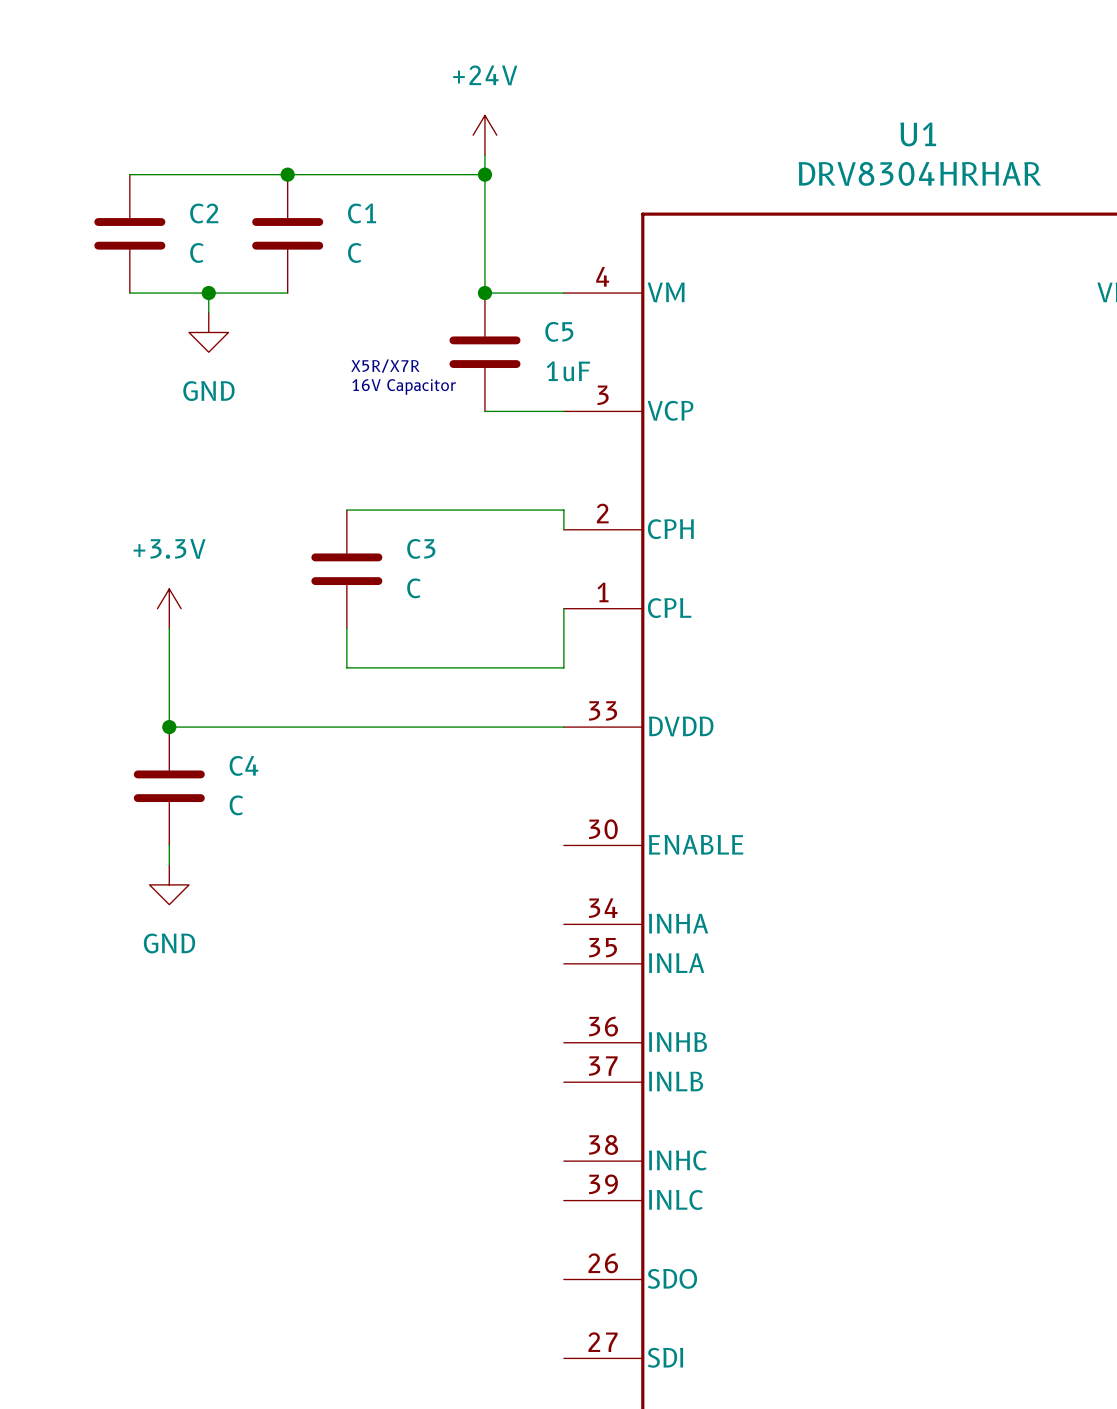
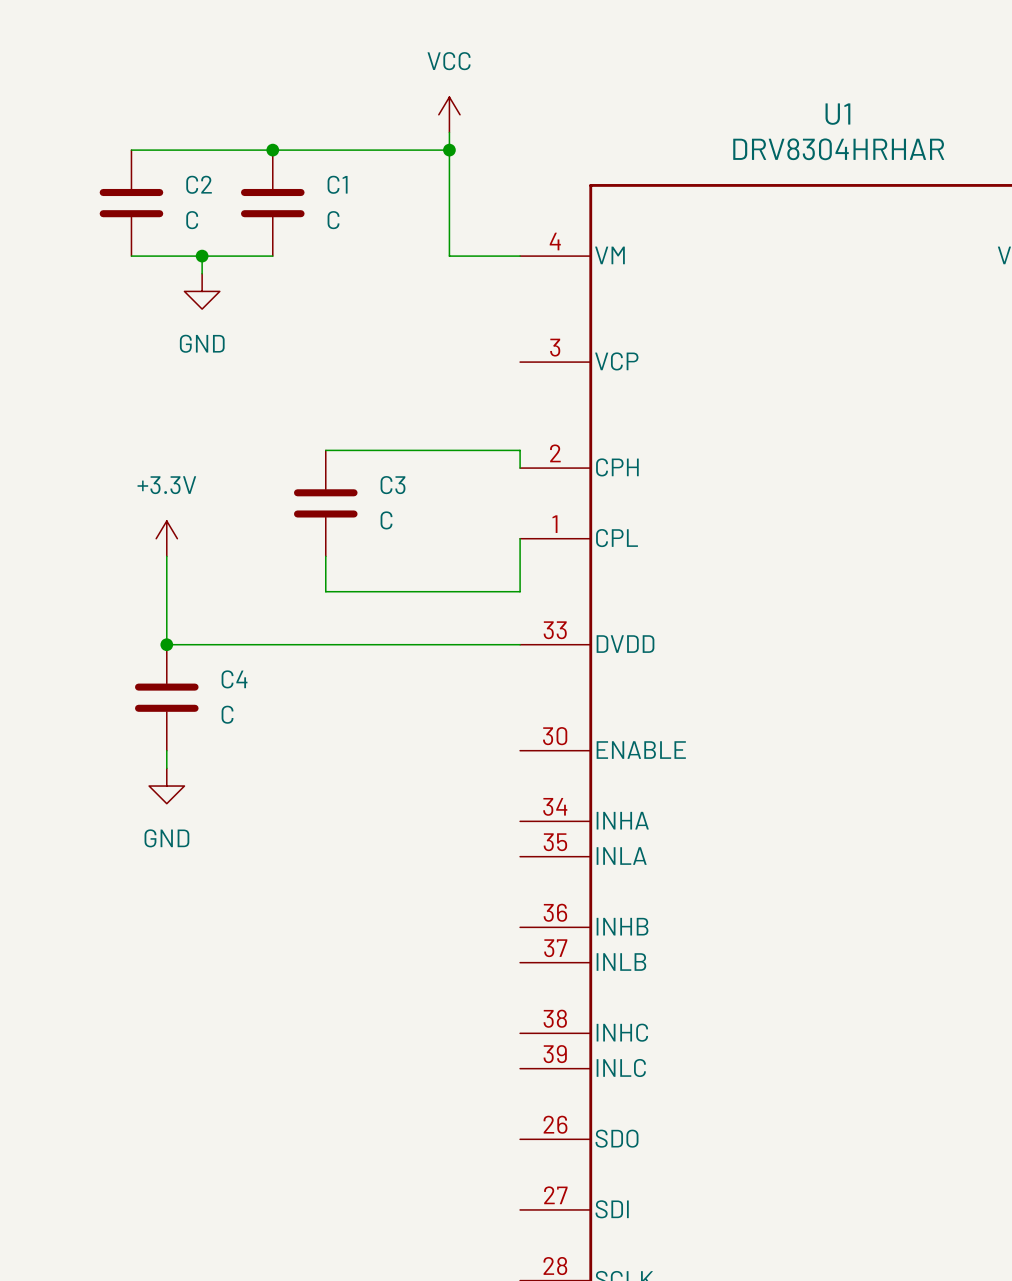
power symbol: +24V (484, 135) -> VCC (449, 114)
junction: (484, 293) -> none
C5: 1uF (484, 352) -> none
text: X5R/X7R (385, 366) -> none
text: 16V Capacitor (404, 386) -> none
wire: (484, 411) (563, 411) -> none

